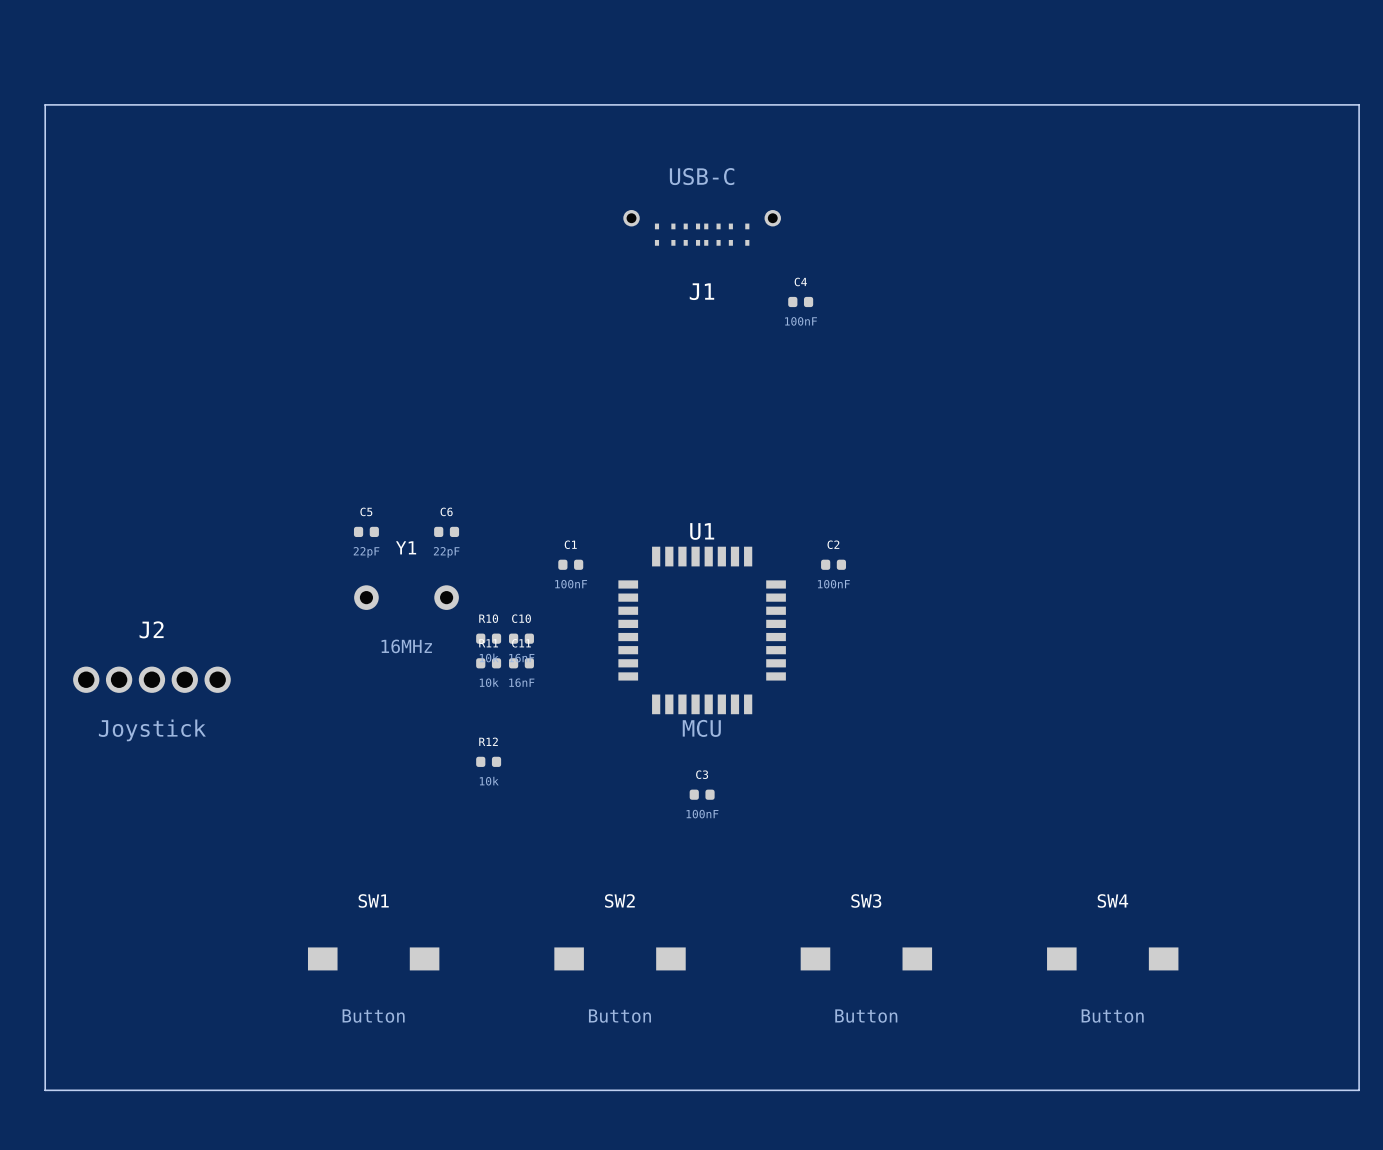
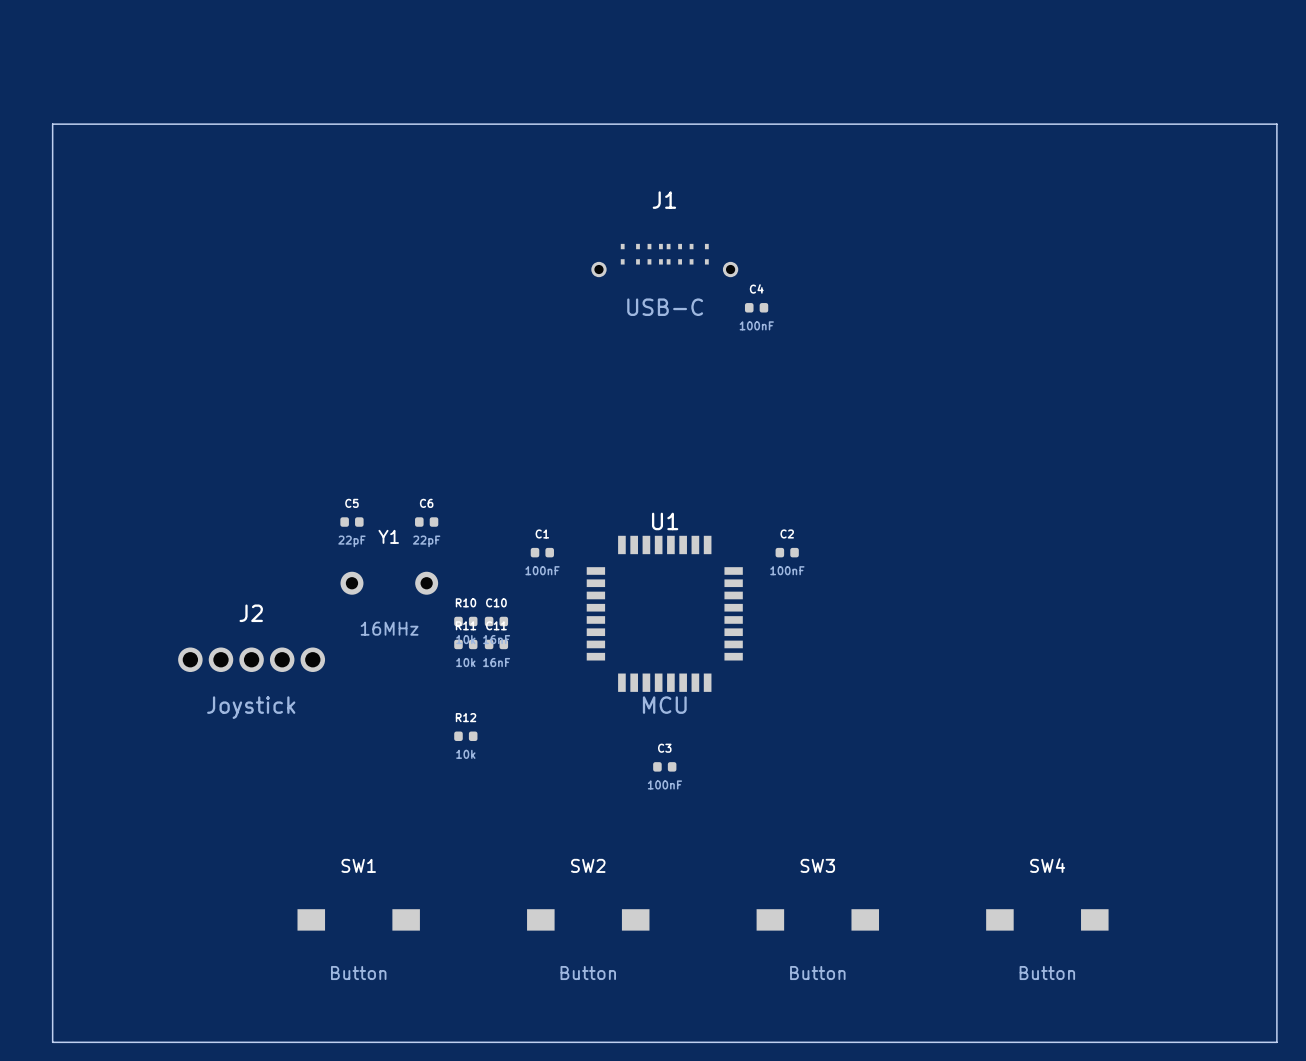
J1 rotation: 0° (702, 227) -> 180° (664, 260)
J2 position: (151, 679) -> (251, 659)

